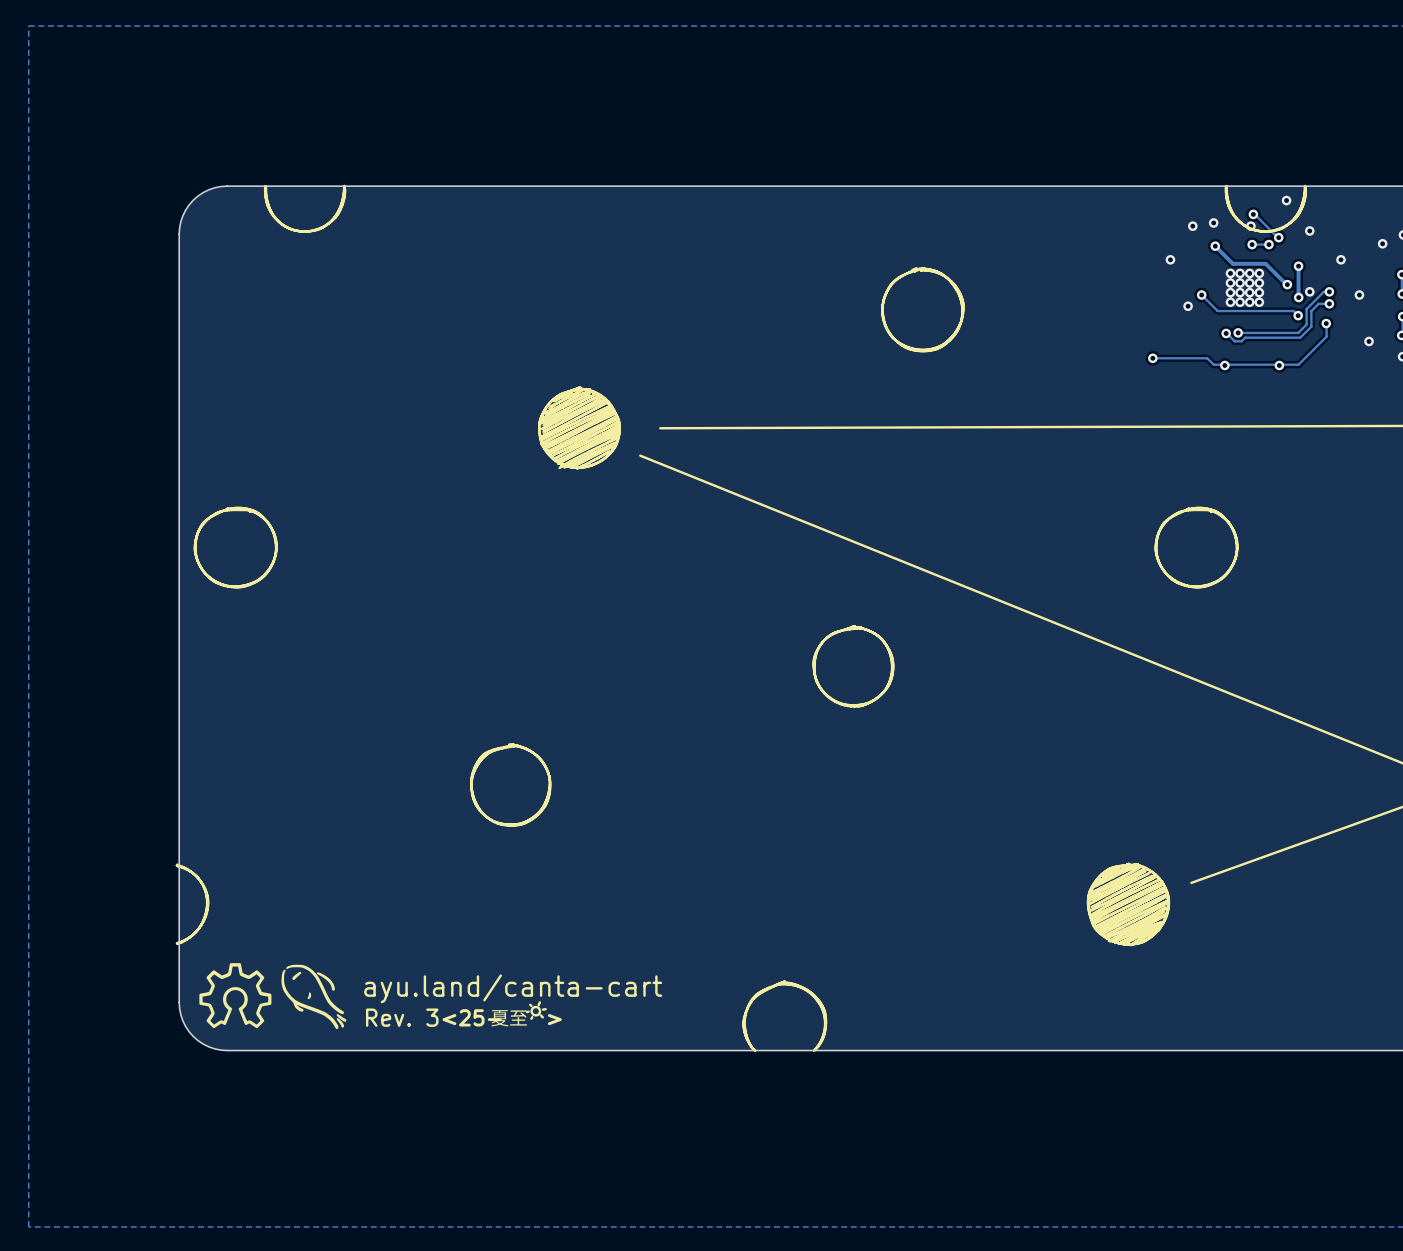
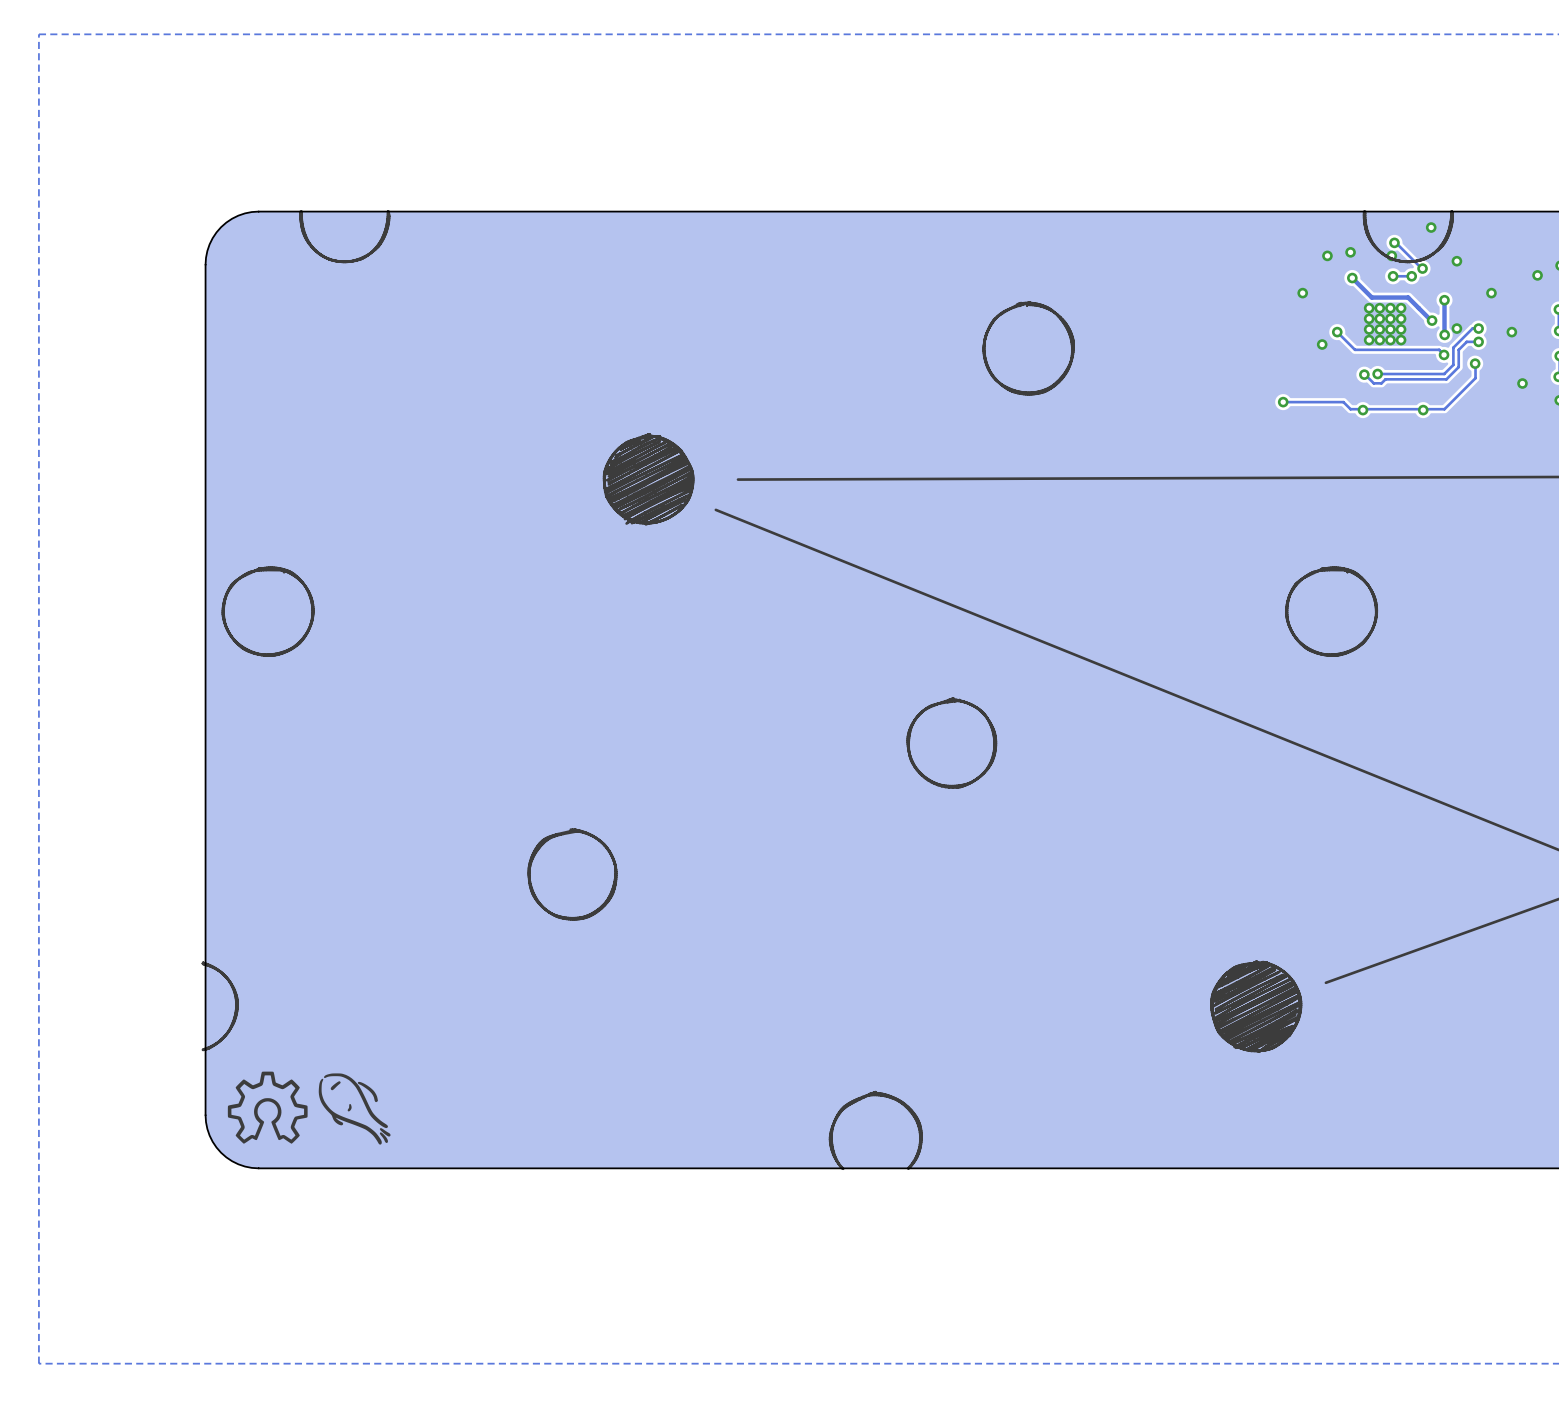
text: ayu.land/canta-cart (513, 988) -> none
line: (539, 1002) (538, 1005) -> none
line: (530, 1004) (531, 1005) -> none
drawing: [530, 1005, 542, 1017] -> none
line: (545, 1009) (543, 1009) -> none
line: (528, 1011) (527, 1012) -> none
line: (540, 1015) (542, 1017) -> none
text: Rev. 3 (402, 1017) -> none
text: <25- (472, 1017) -> none
line: (532, 1017) (531, 1018) -> none
text: 夏至 (509, 1018) -> none
text: > (554, 1019) -> none

